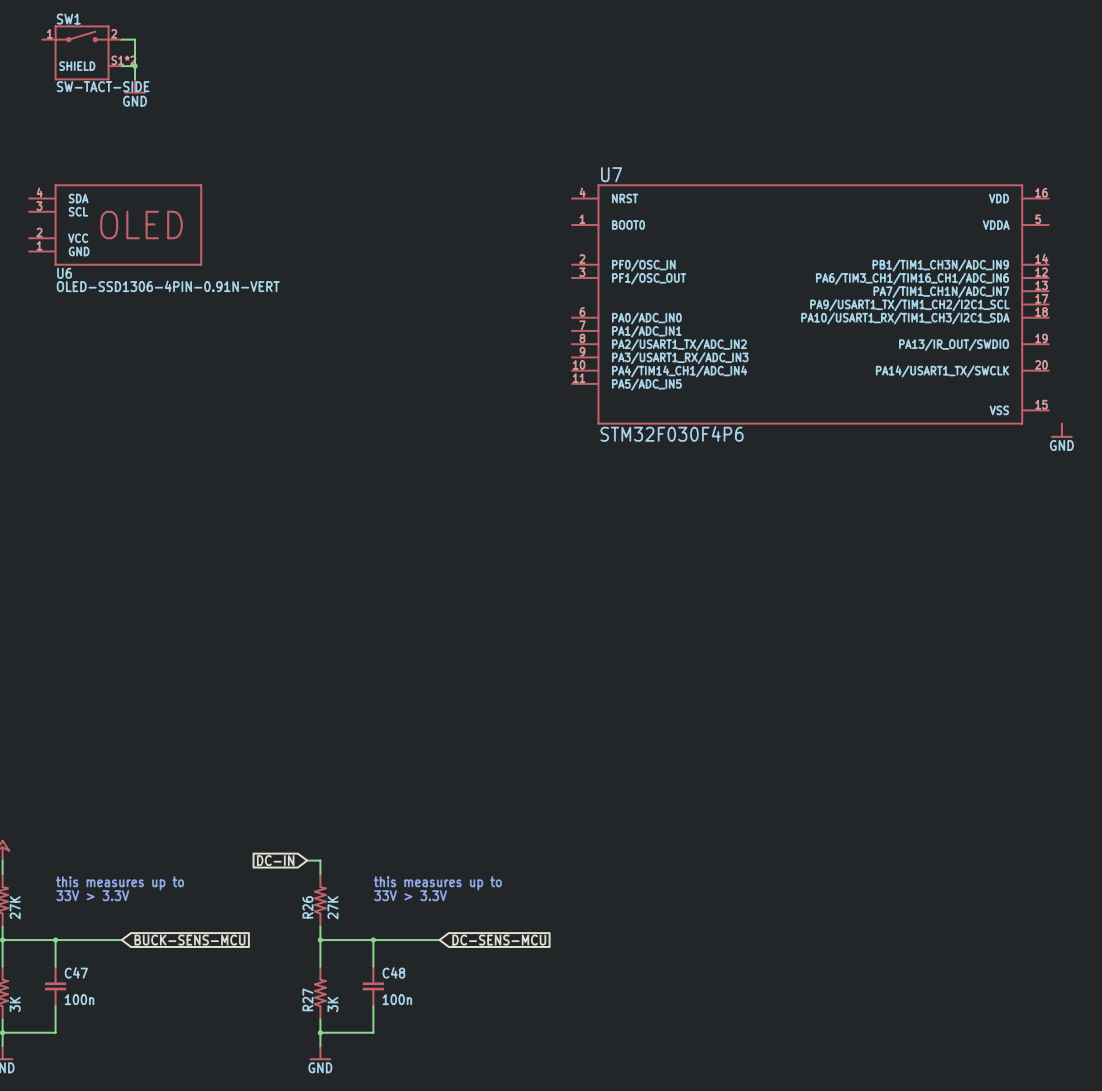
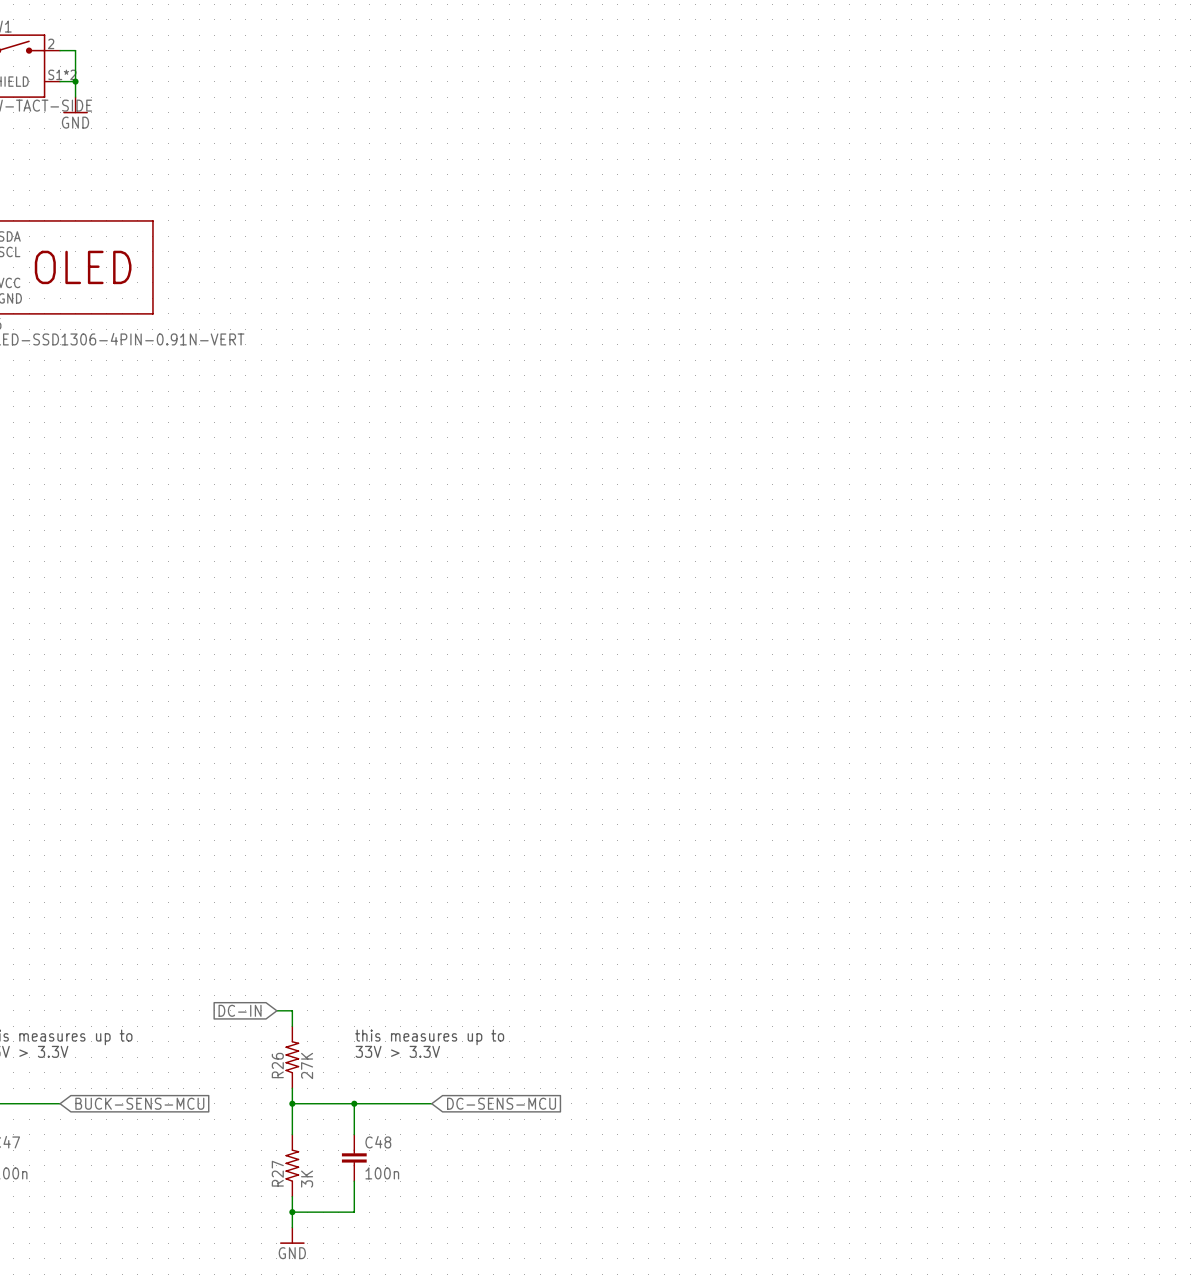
U7: STM32F030F4P6 (810, 304) -> none
power symbol: GND (1061, 430) -> none

